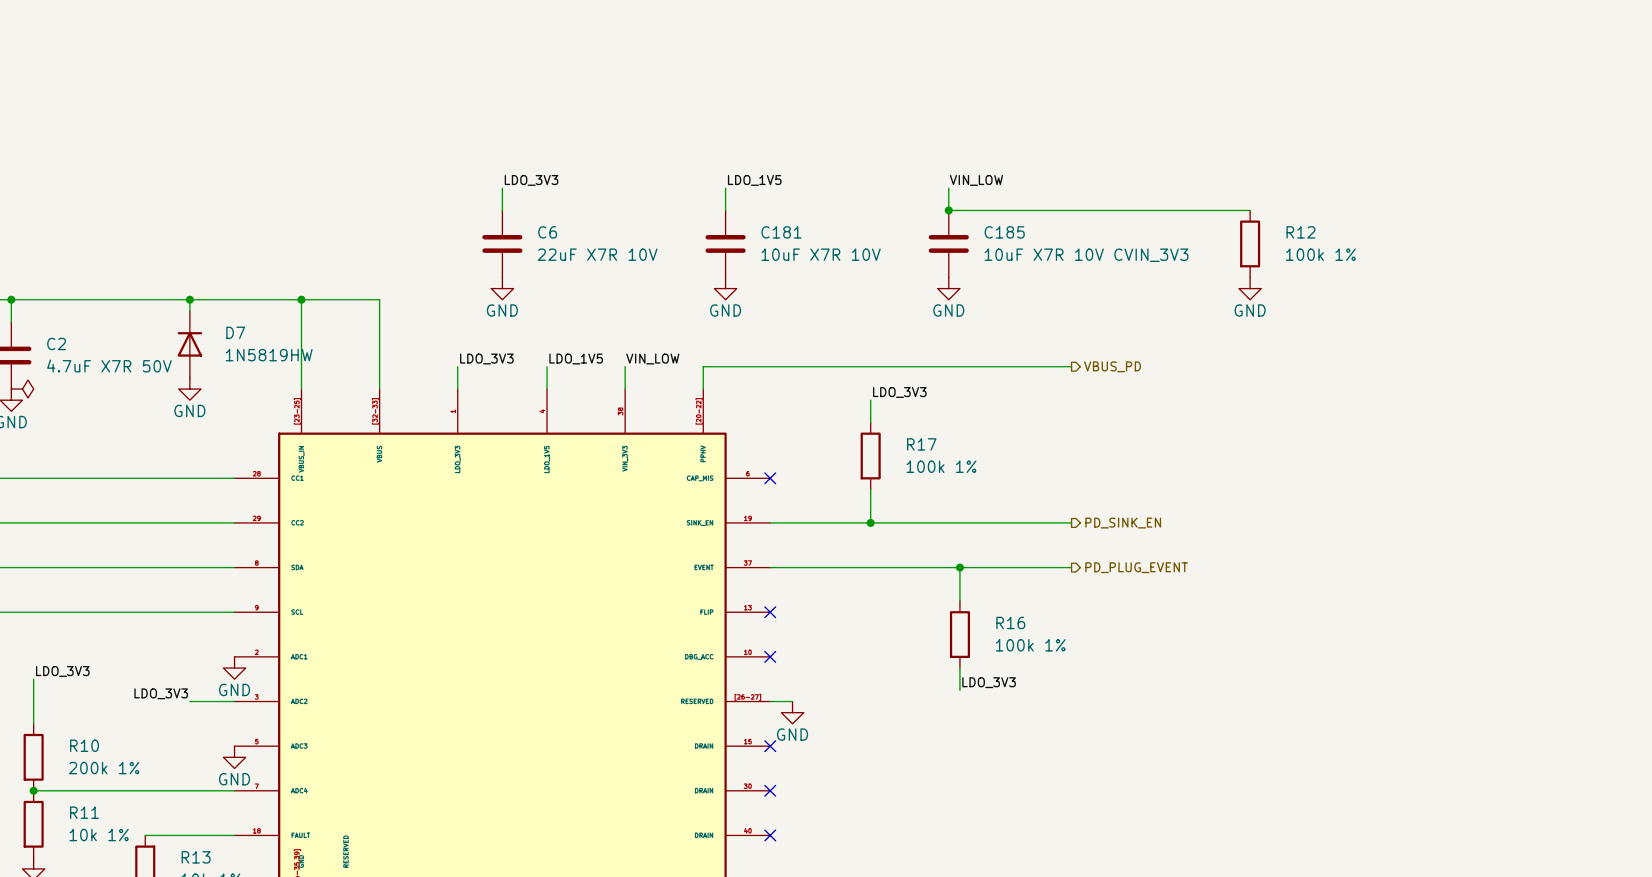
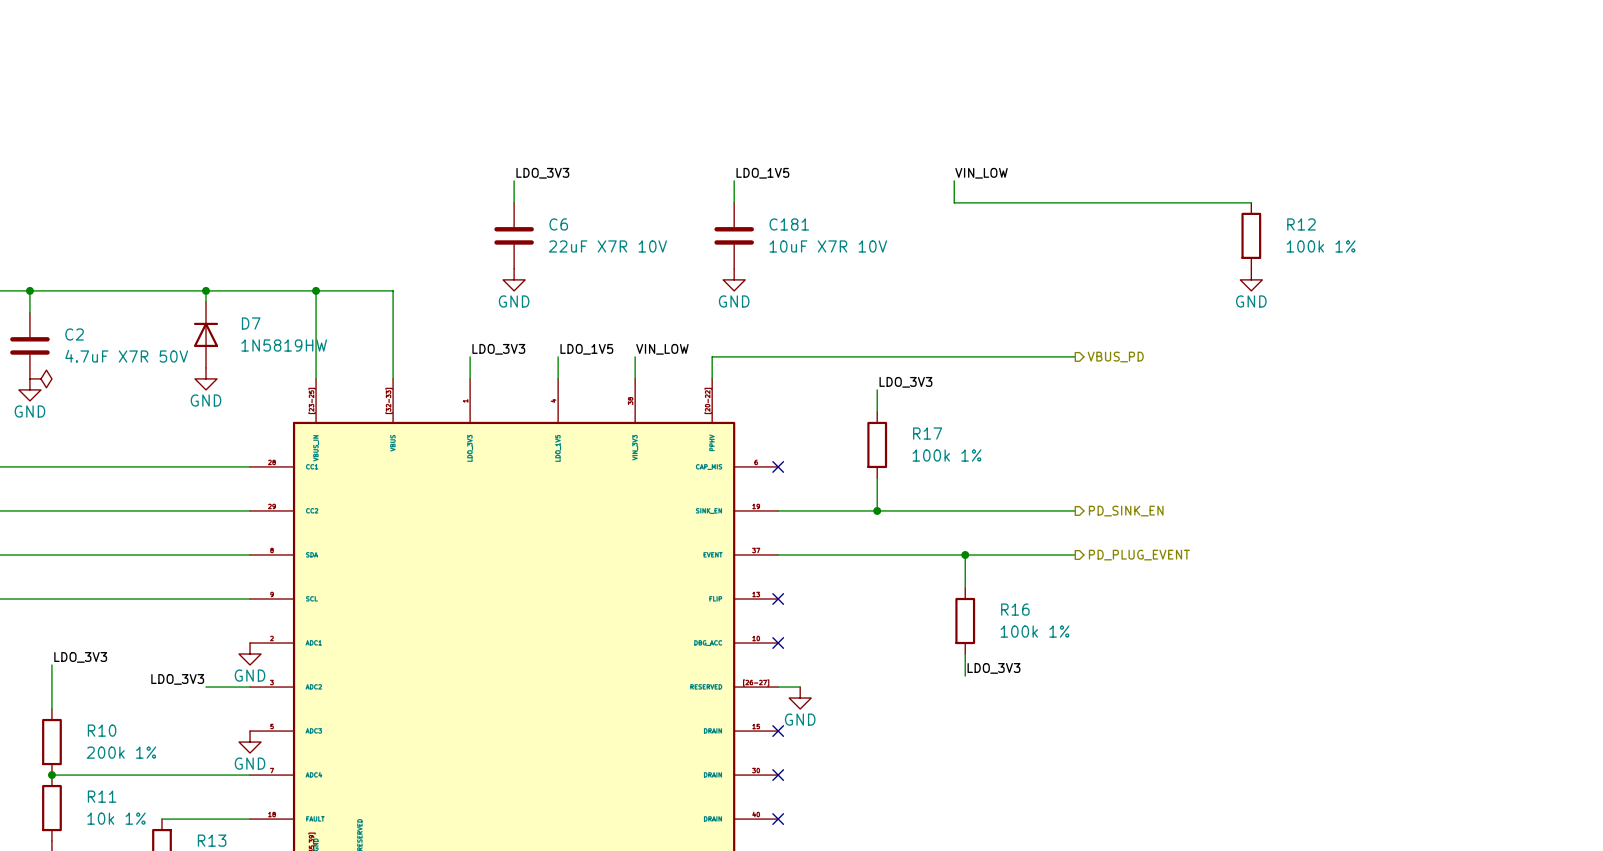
junction: (948, 210) -> none
C185: 10uF X7R 10V CVIN_3V3 (948, 243) -> none
power symbol: GND (948, 288) -> none

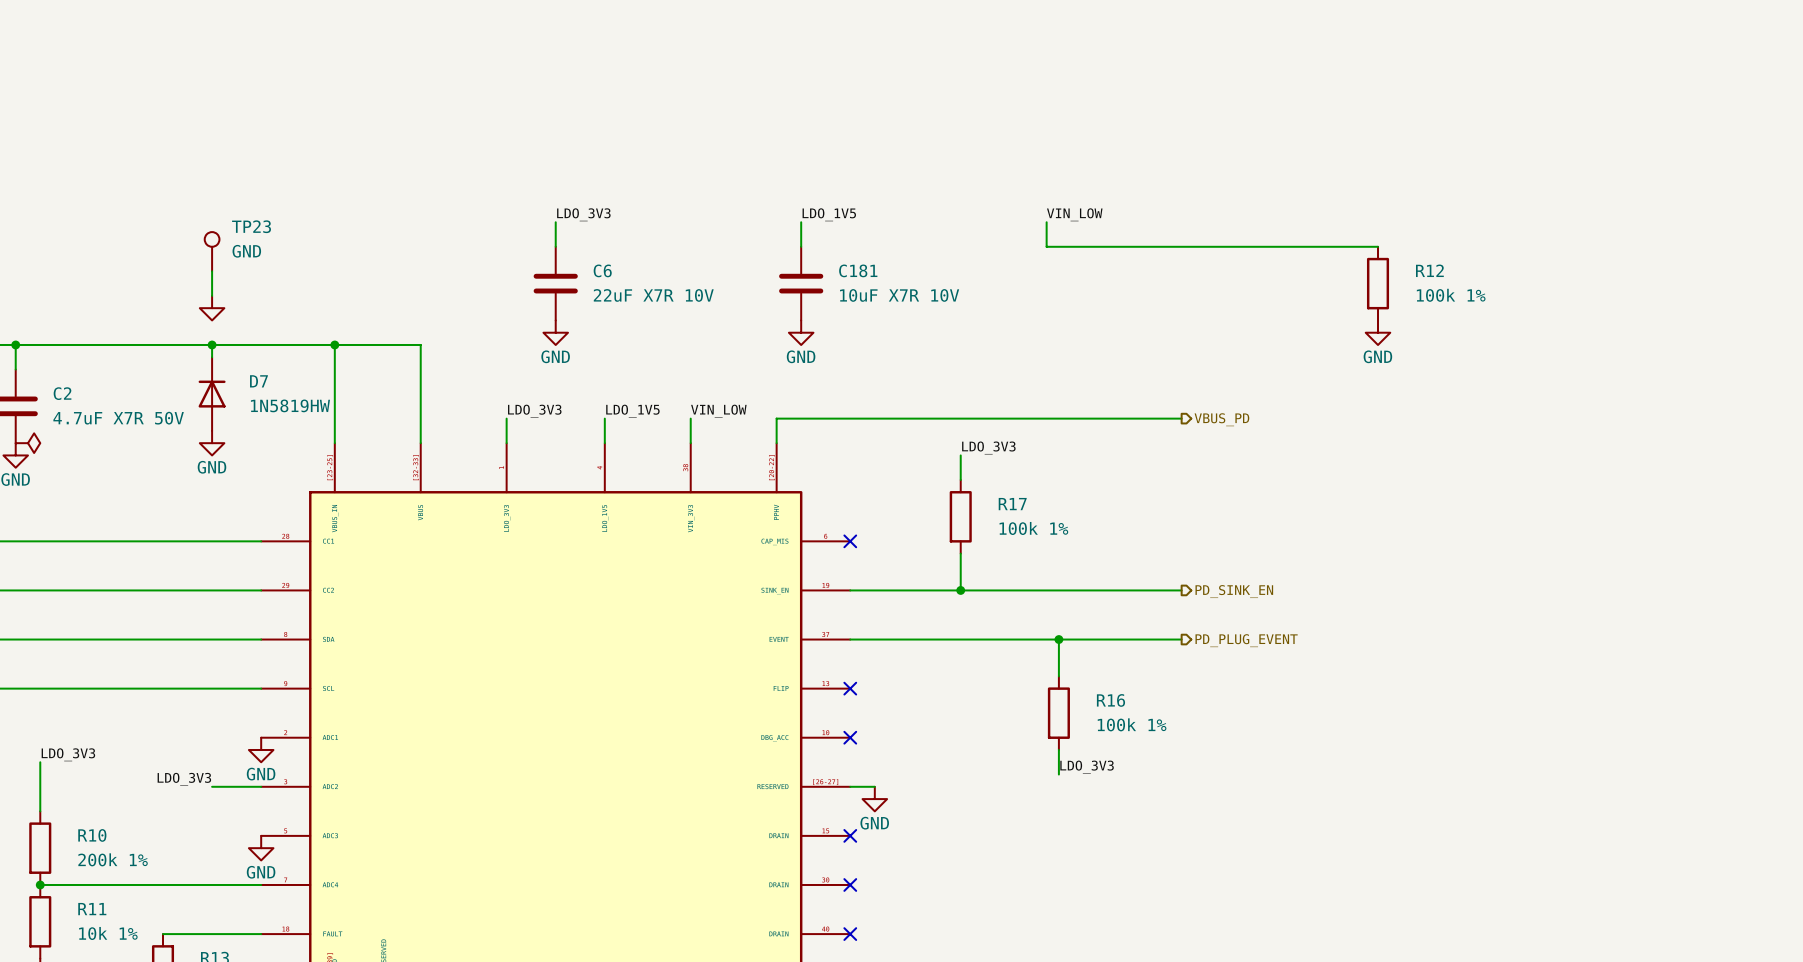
TP23: none -> GND (212, 251)
wire: none -> (212, 271) (212, 295)
power symbol: none -> (212, 308)

